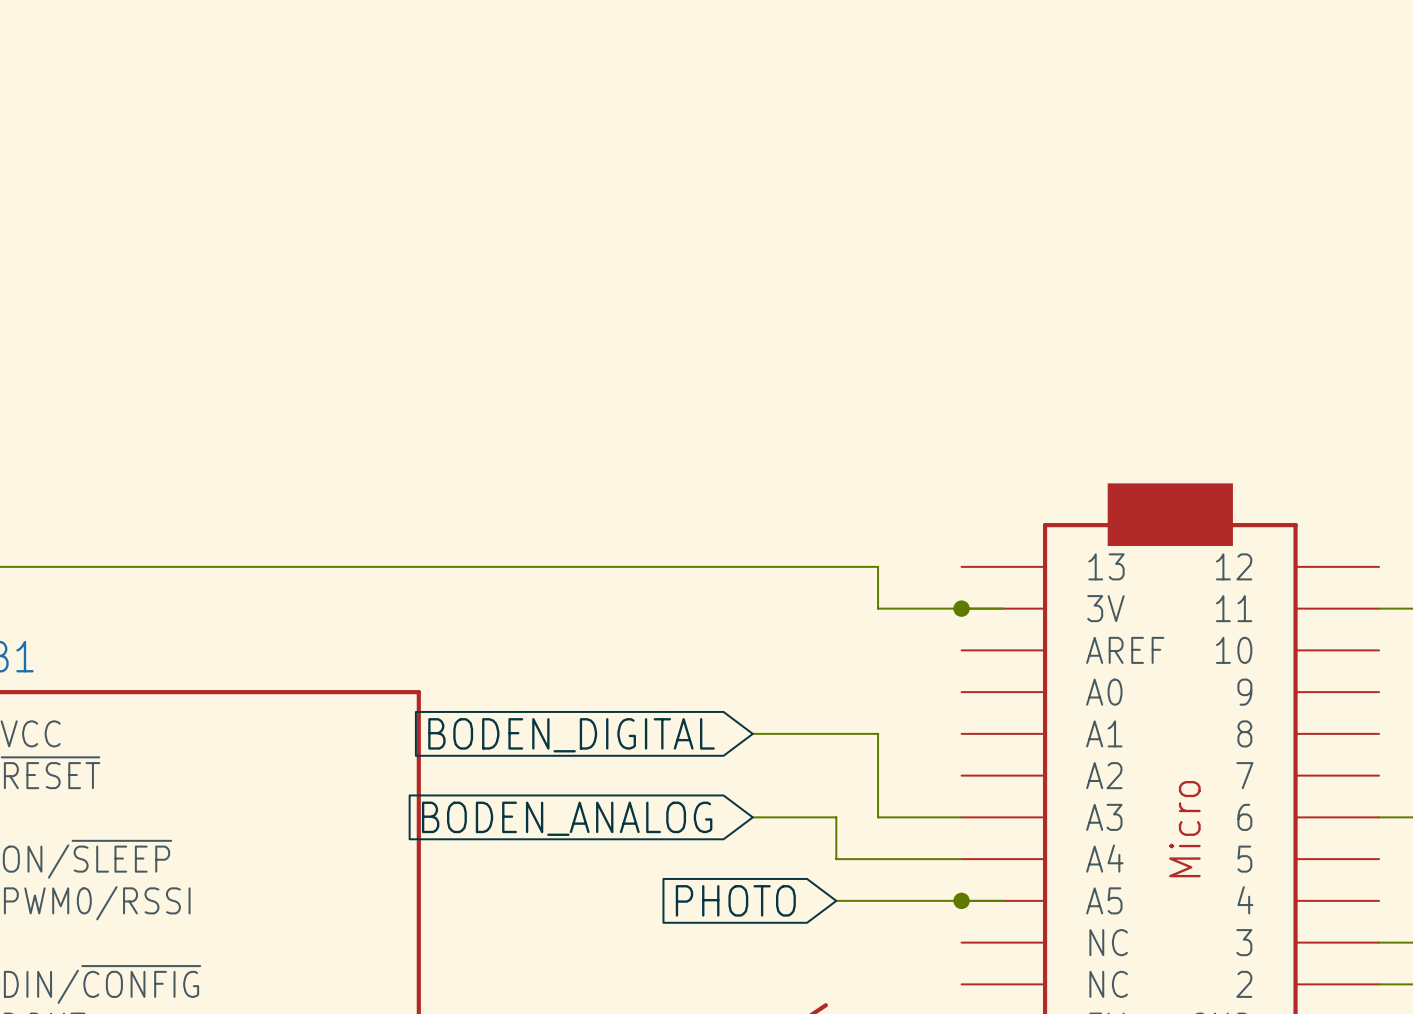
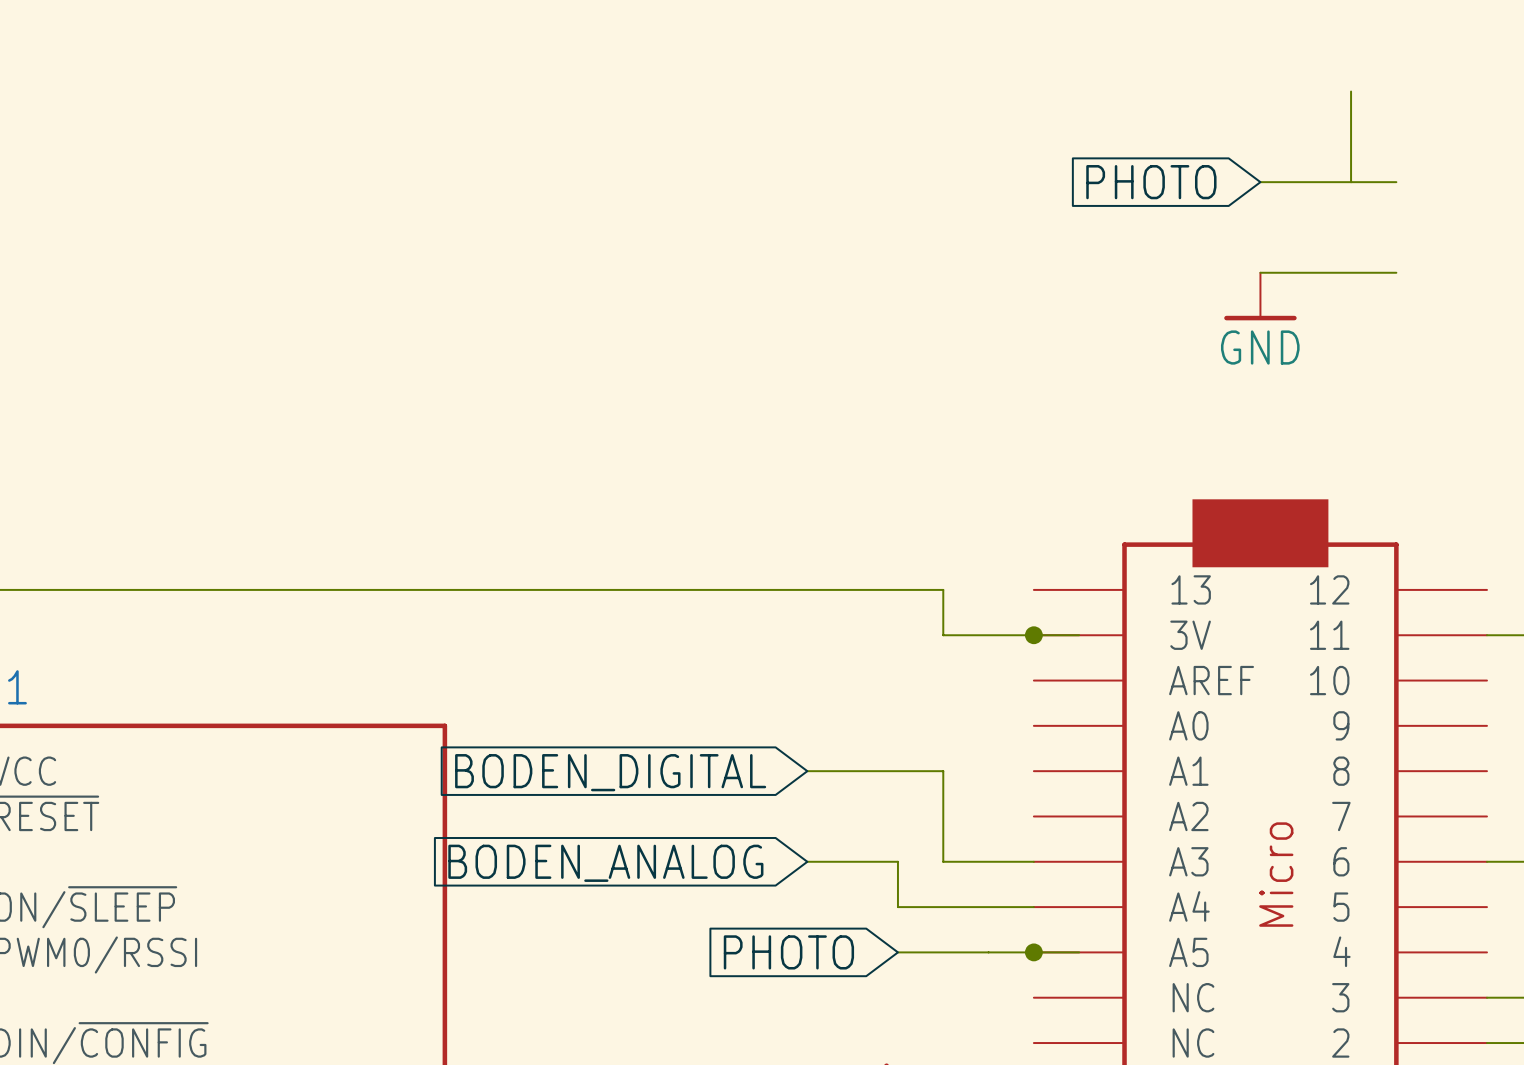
wire: none -> (1351, 91) (1351, 182)
global label: none -> PHOTO (1151, 182)
wire: none -> (1260, 182) (1396, 182)
wire: none -> (1260, 272) (1396, 272)
power symbol: none -> GND (1260, 296)

